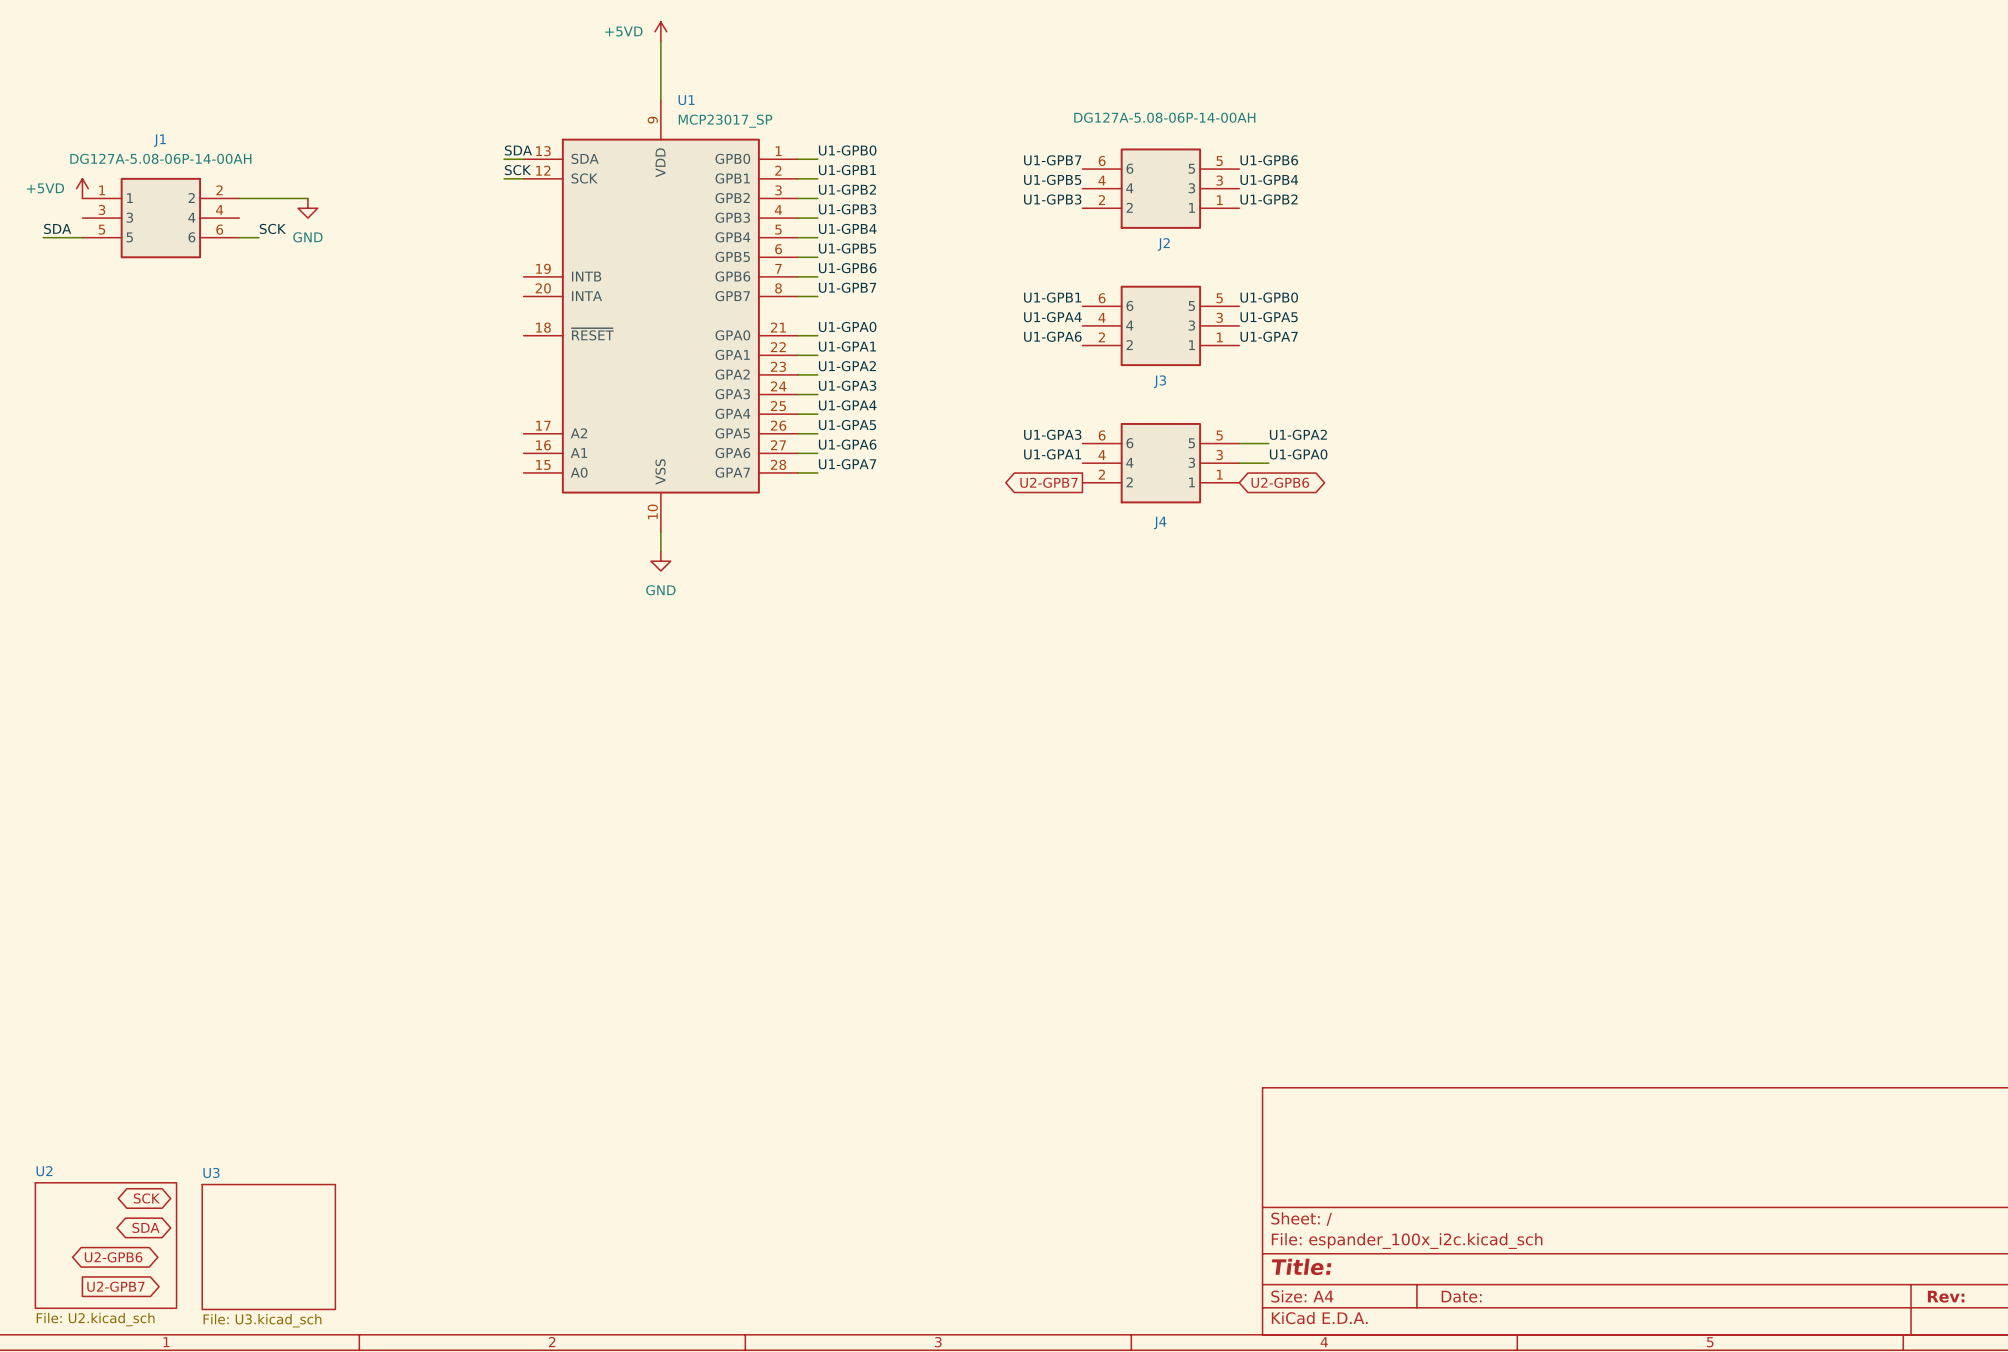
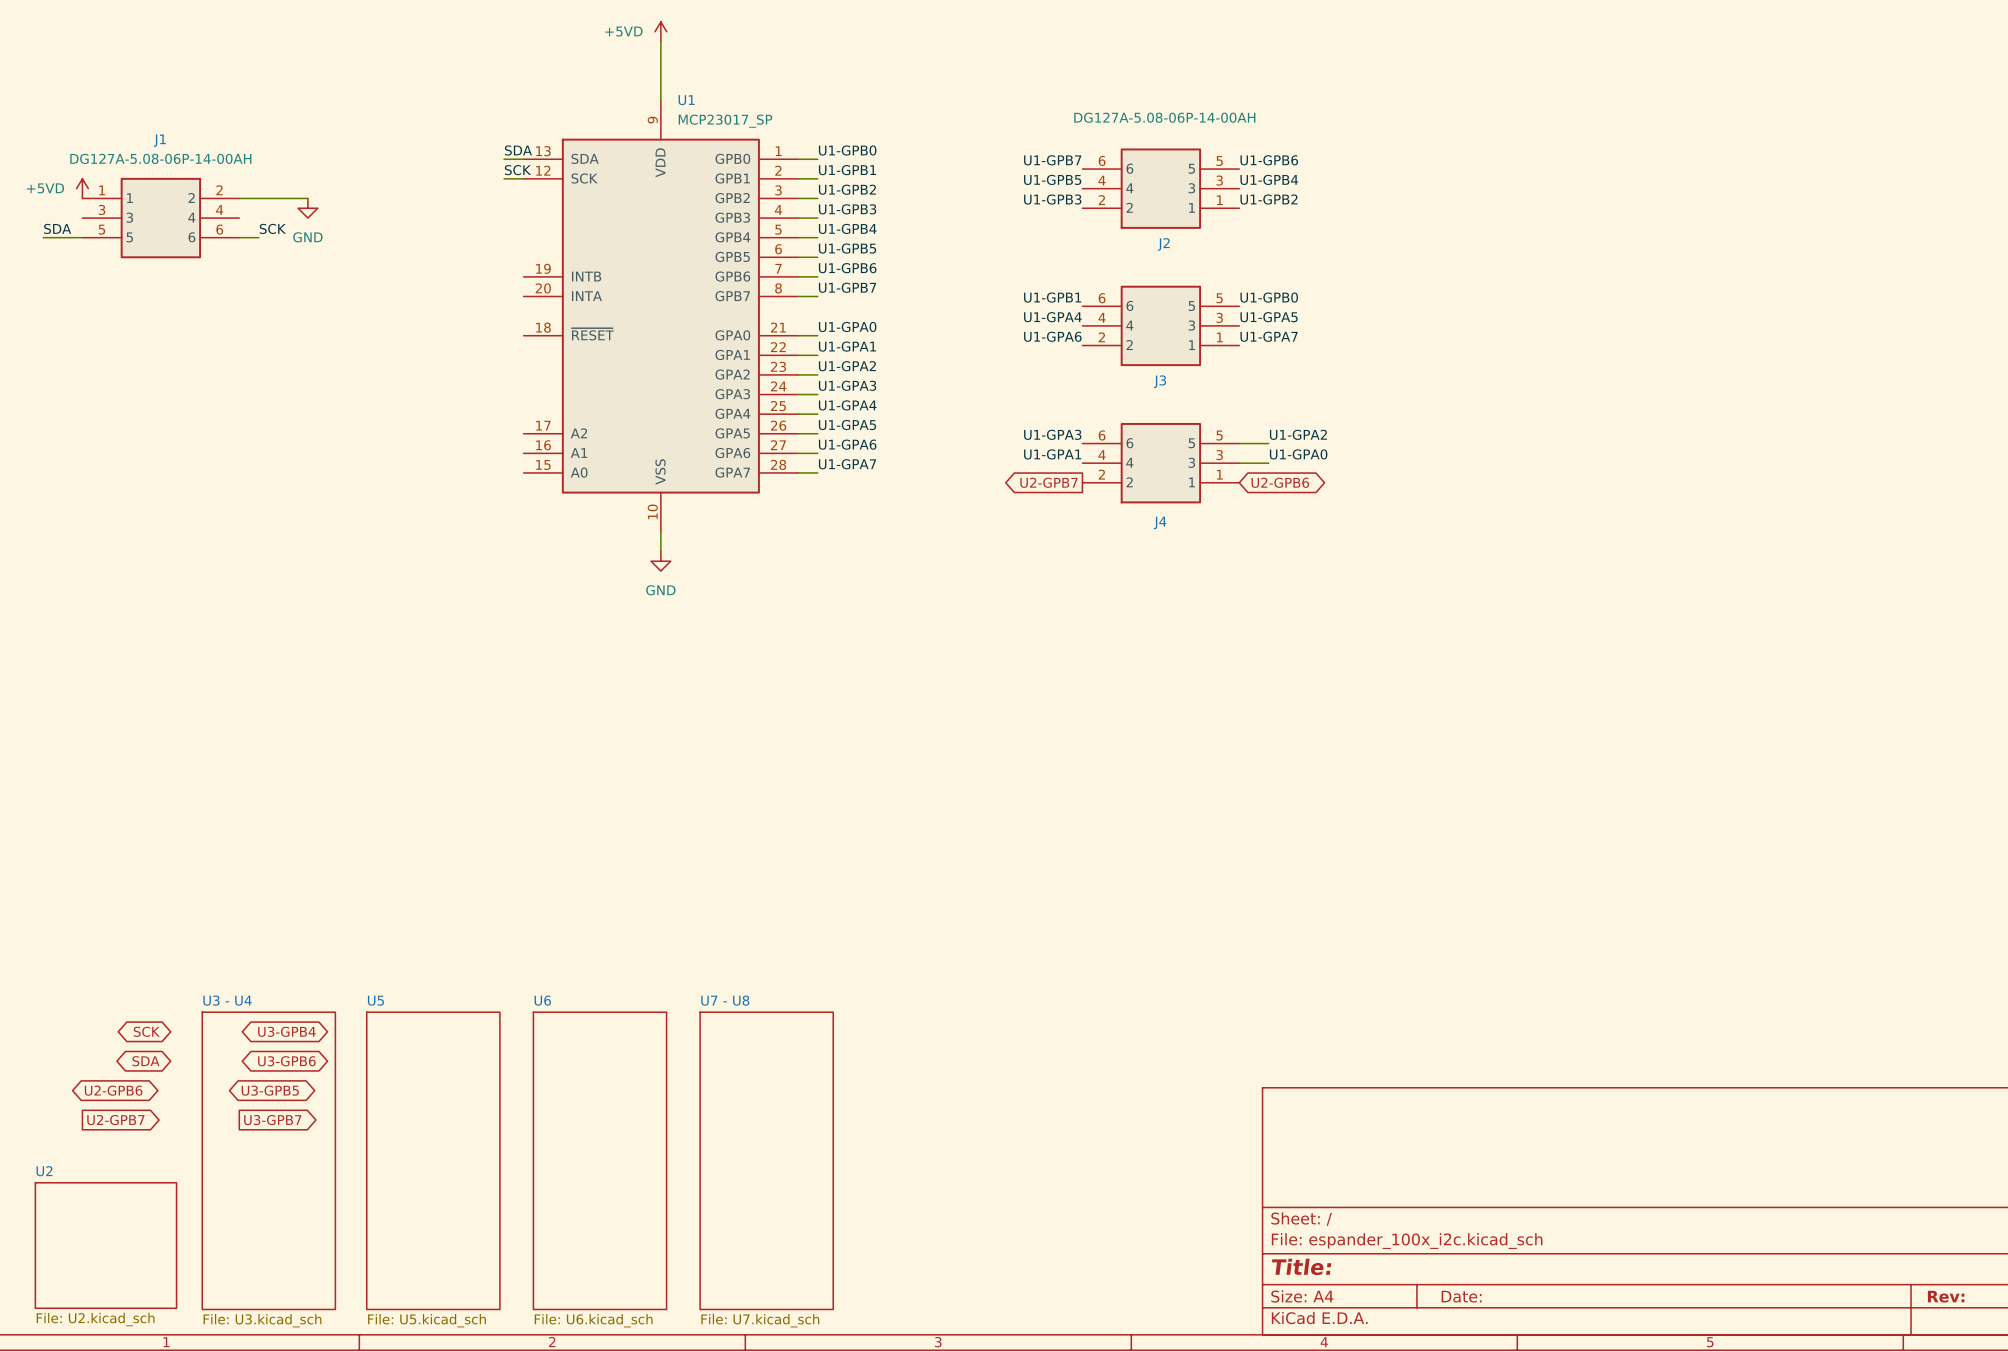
global label: none -> U3-GPB4 (286, 1031)
global label: none -> U3-GPB6 (286, 1061)
global label: none -> U3-GPB5 (270, 1090)
global label: none -> U3-GPB7 (272, 1120)
sheet U3 - U4: none -> File: U3.kicad_sch (268, 1160)
sheet U5: none -> File: U5.kicad_sch (433, 1160)
sheet U6: none -> File: U6.kicad_sch (599, 1160)
sheet U7 - U8: none -> File: U7.kicad_sch (766, 1160)
global label position: SCK (146, 1198) -> SCK (146, 1031)
global label position: SDA (145, 1227) -> SDA (145, 1061)
sheet U3: File: U3.kicad_sch (268, 1247) -> none
global label position: U2-GPB6 (113, 1257) -> U2-GPB6 (113, 1090)
global label position: U2-GPB7 (115, 1286) -> U2-GPB7 (115, 1120)

